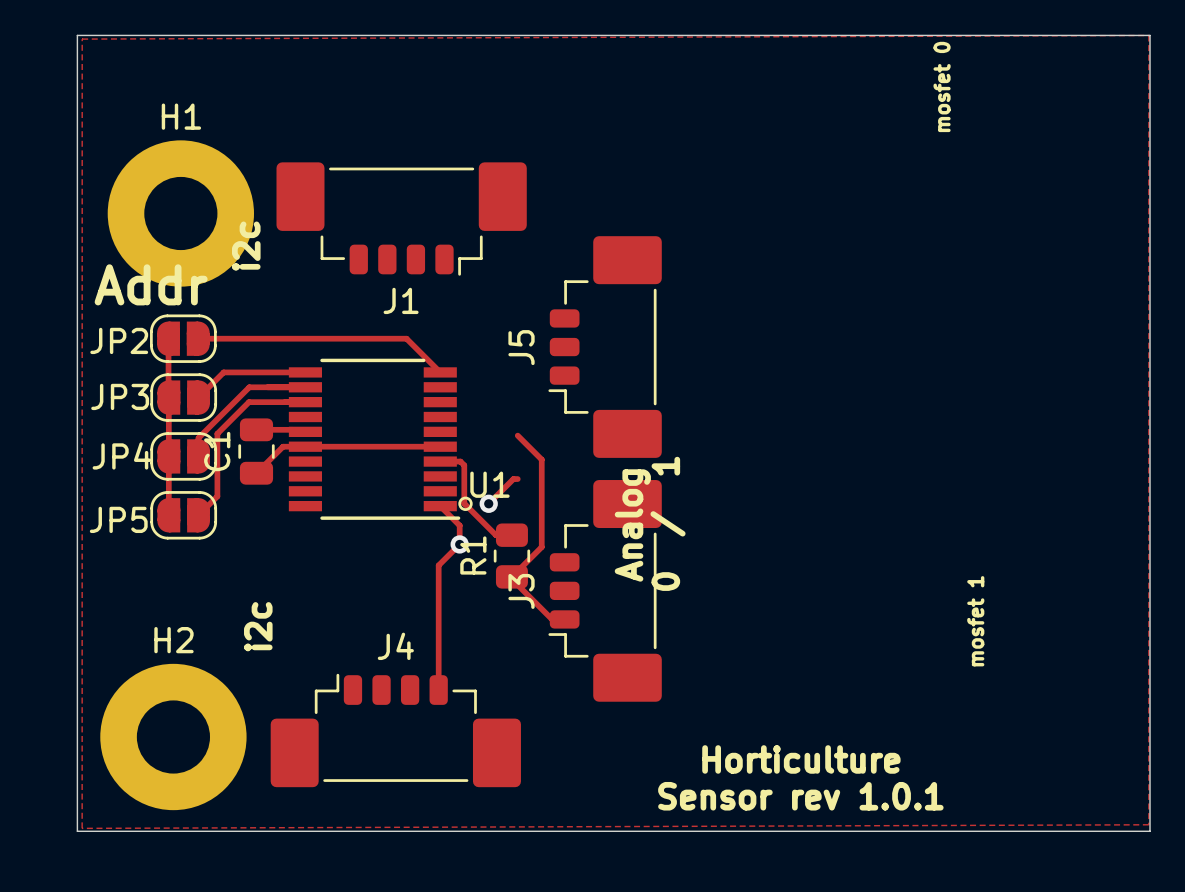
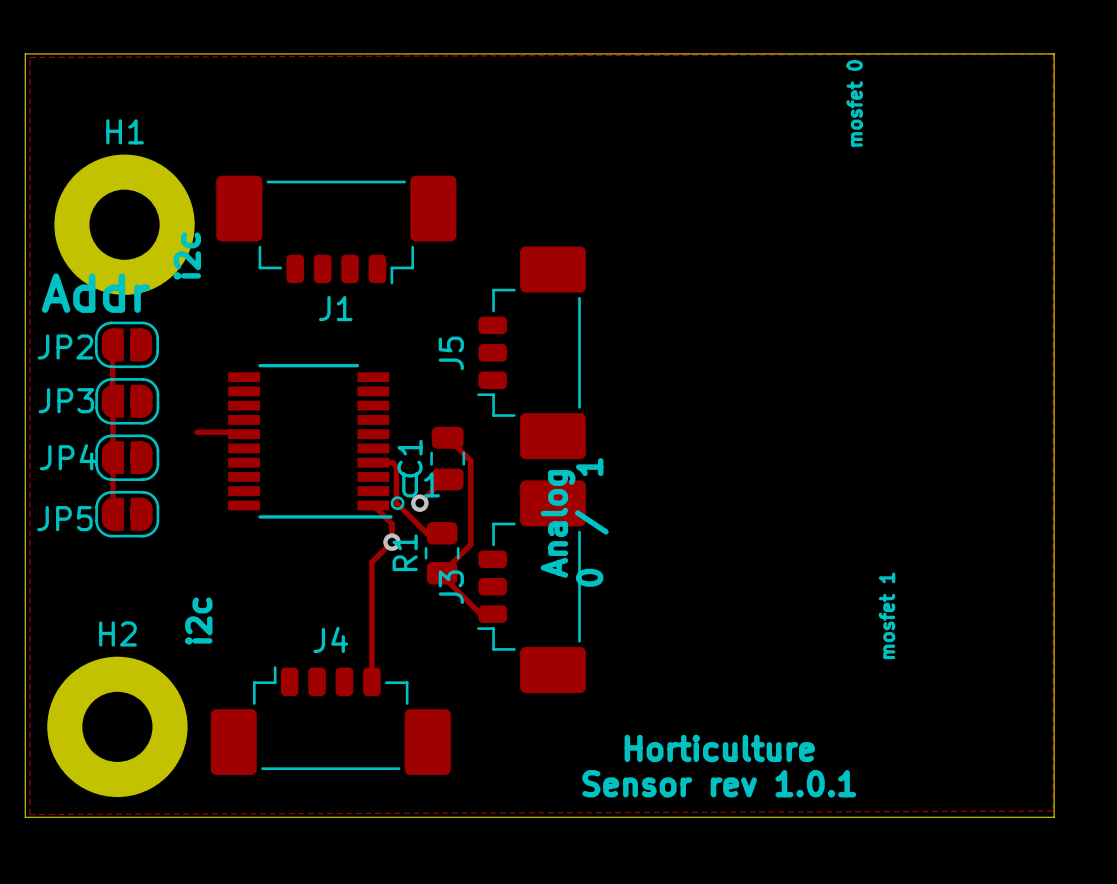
track: (198, 338) (406, 338) (440, 372) -> none
track: (305, 372) (223, 372) (198, 397) -> none
track: (305, 387) (249, 387) (198, 438) (198, 457) -> none
track: (305, 402) (249, 402) (217, 433) (217, 496) (198, 515) -> none
track: (440, 446) (283, 446) (256, 473) -> none
C1 position: (256, 451) -> (447, 458)

